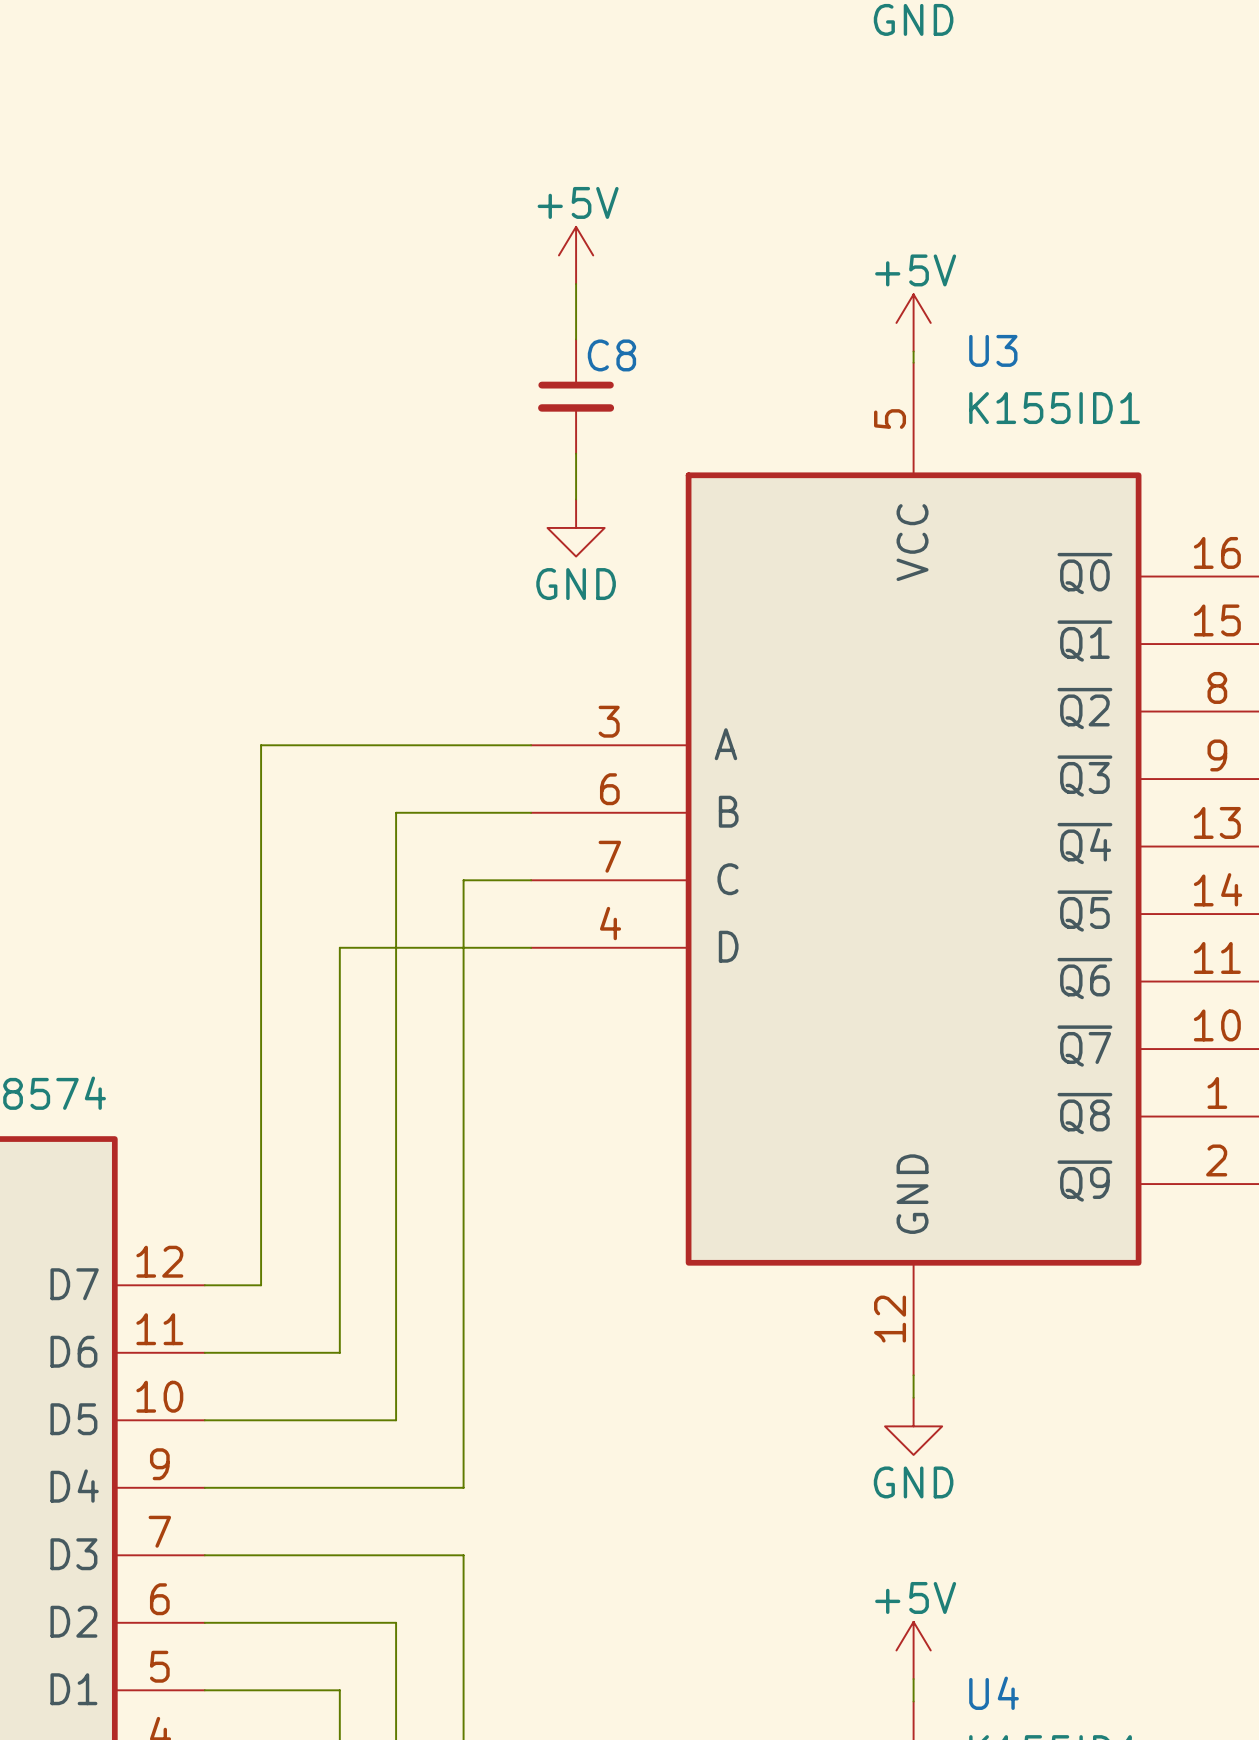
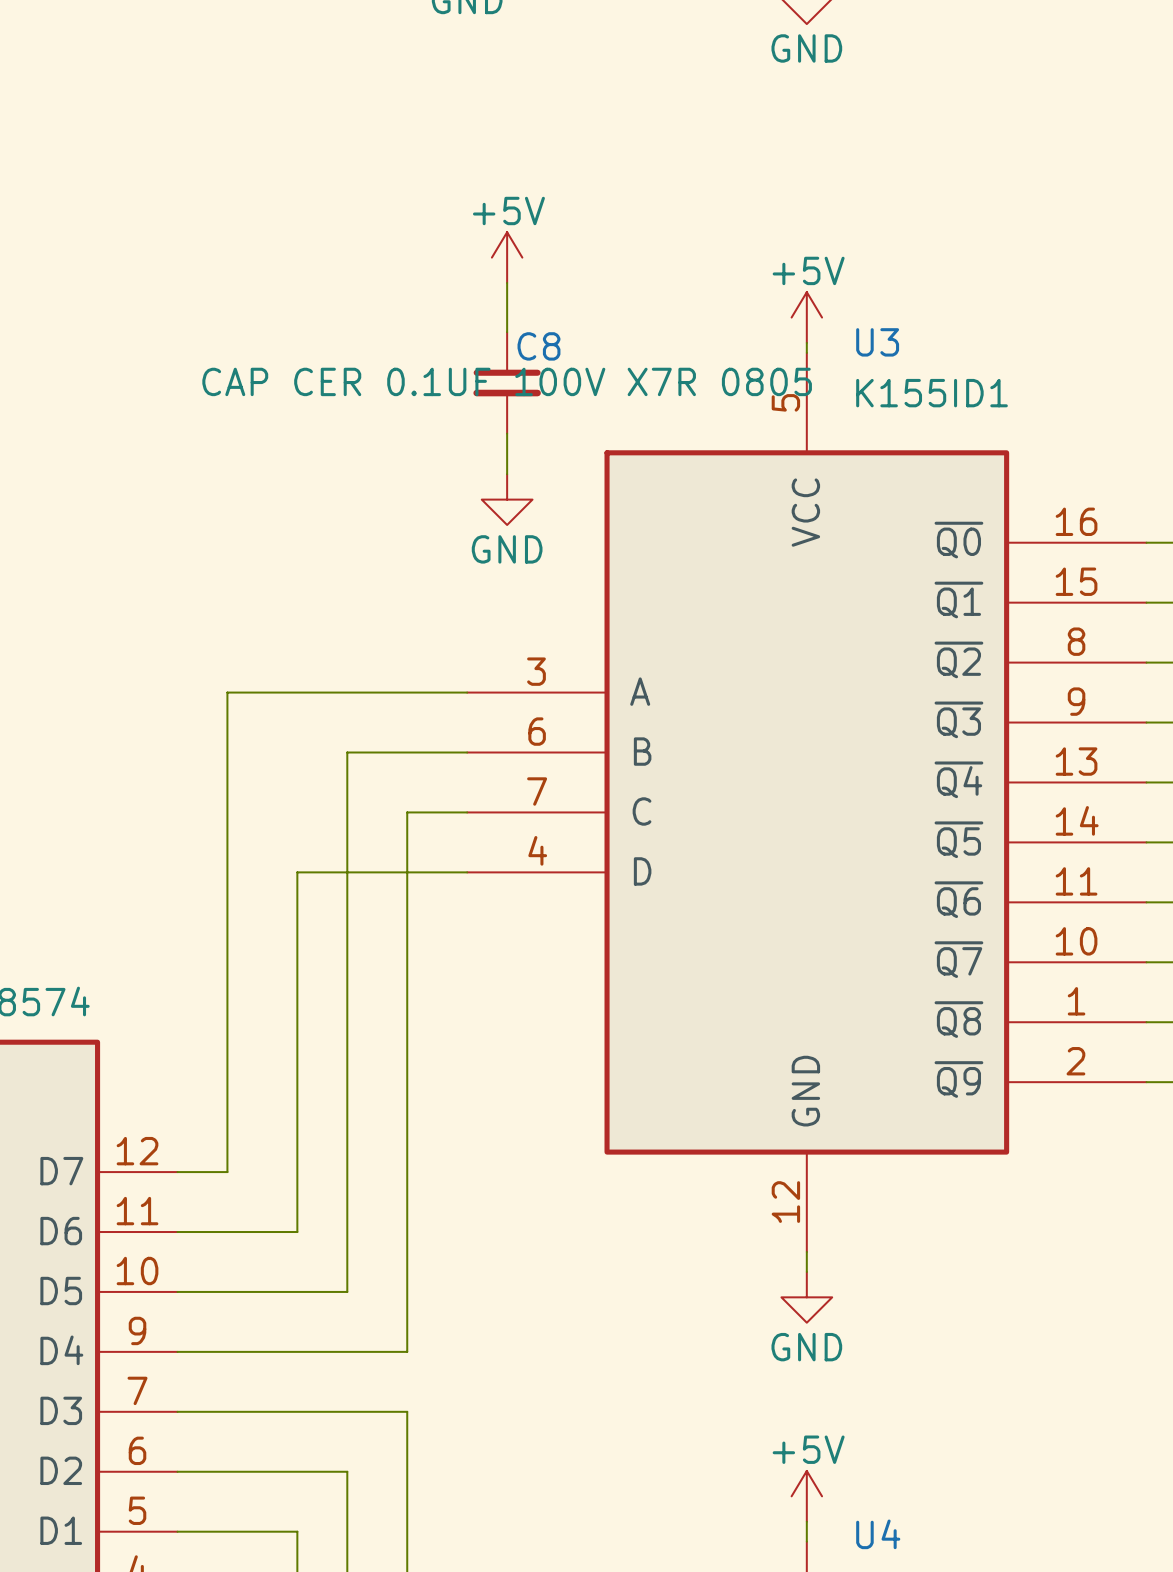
C8 text: none -> CAP CER 0.1UF 100V X7R 0805 (507, 381)

